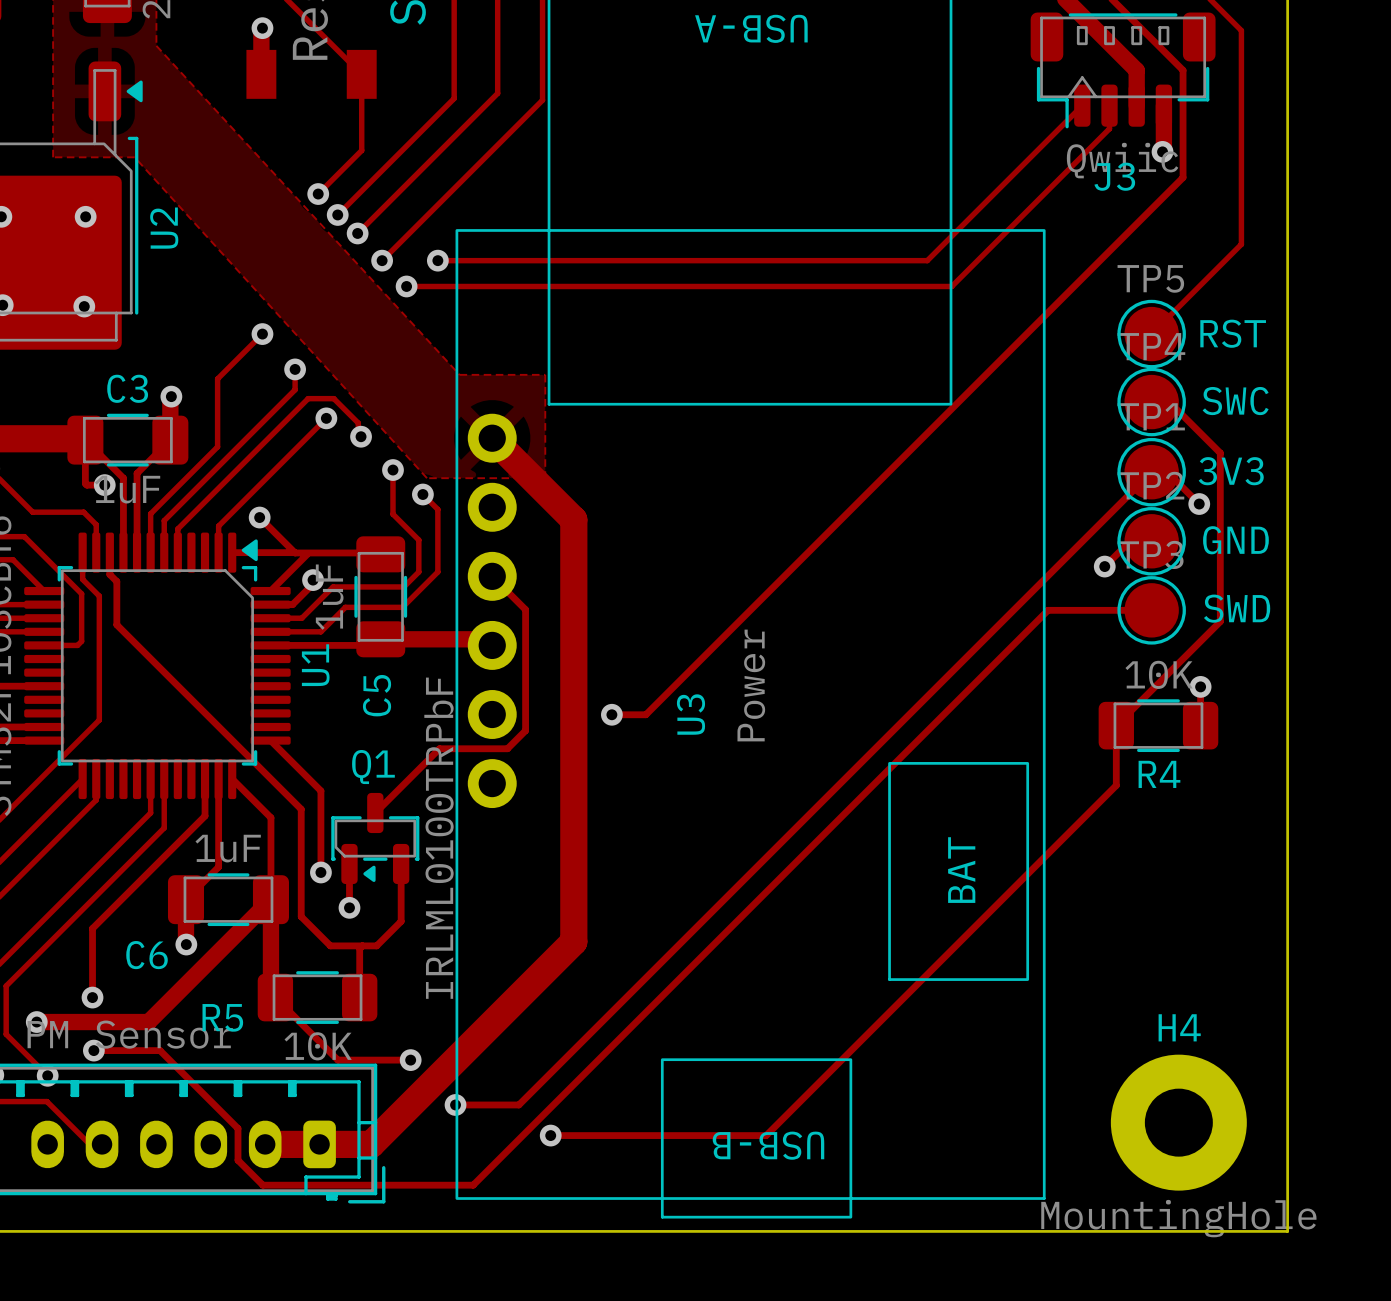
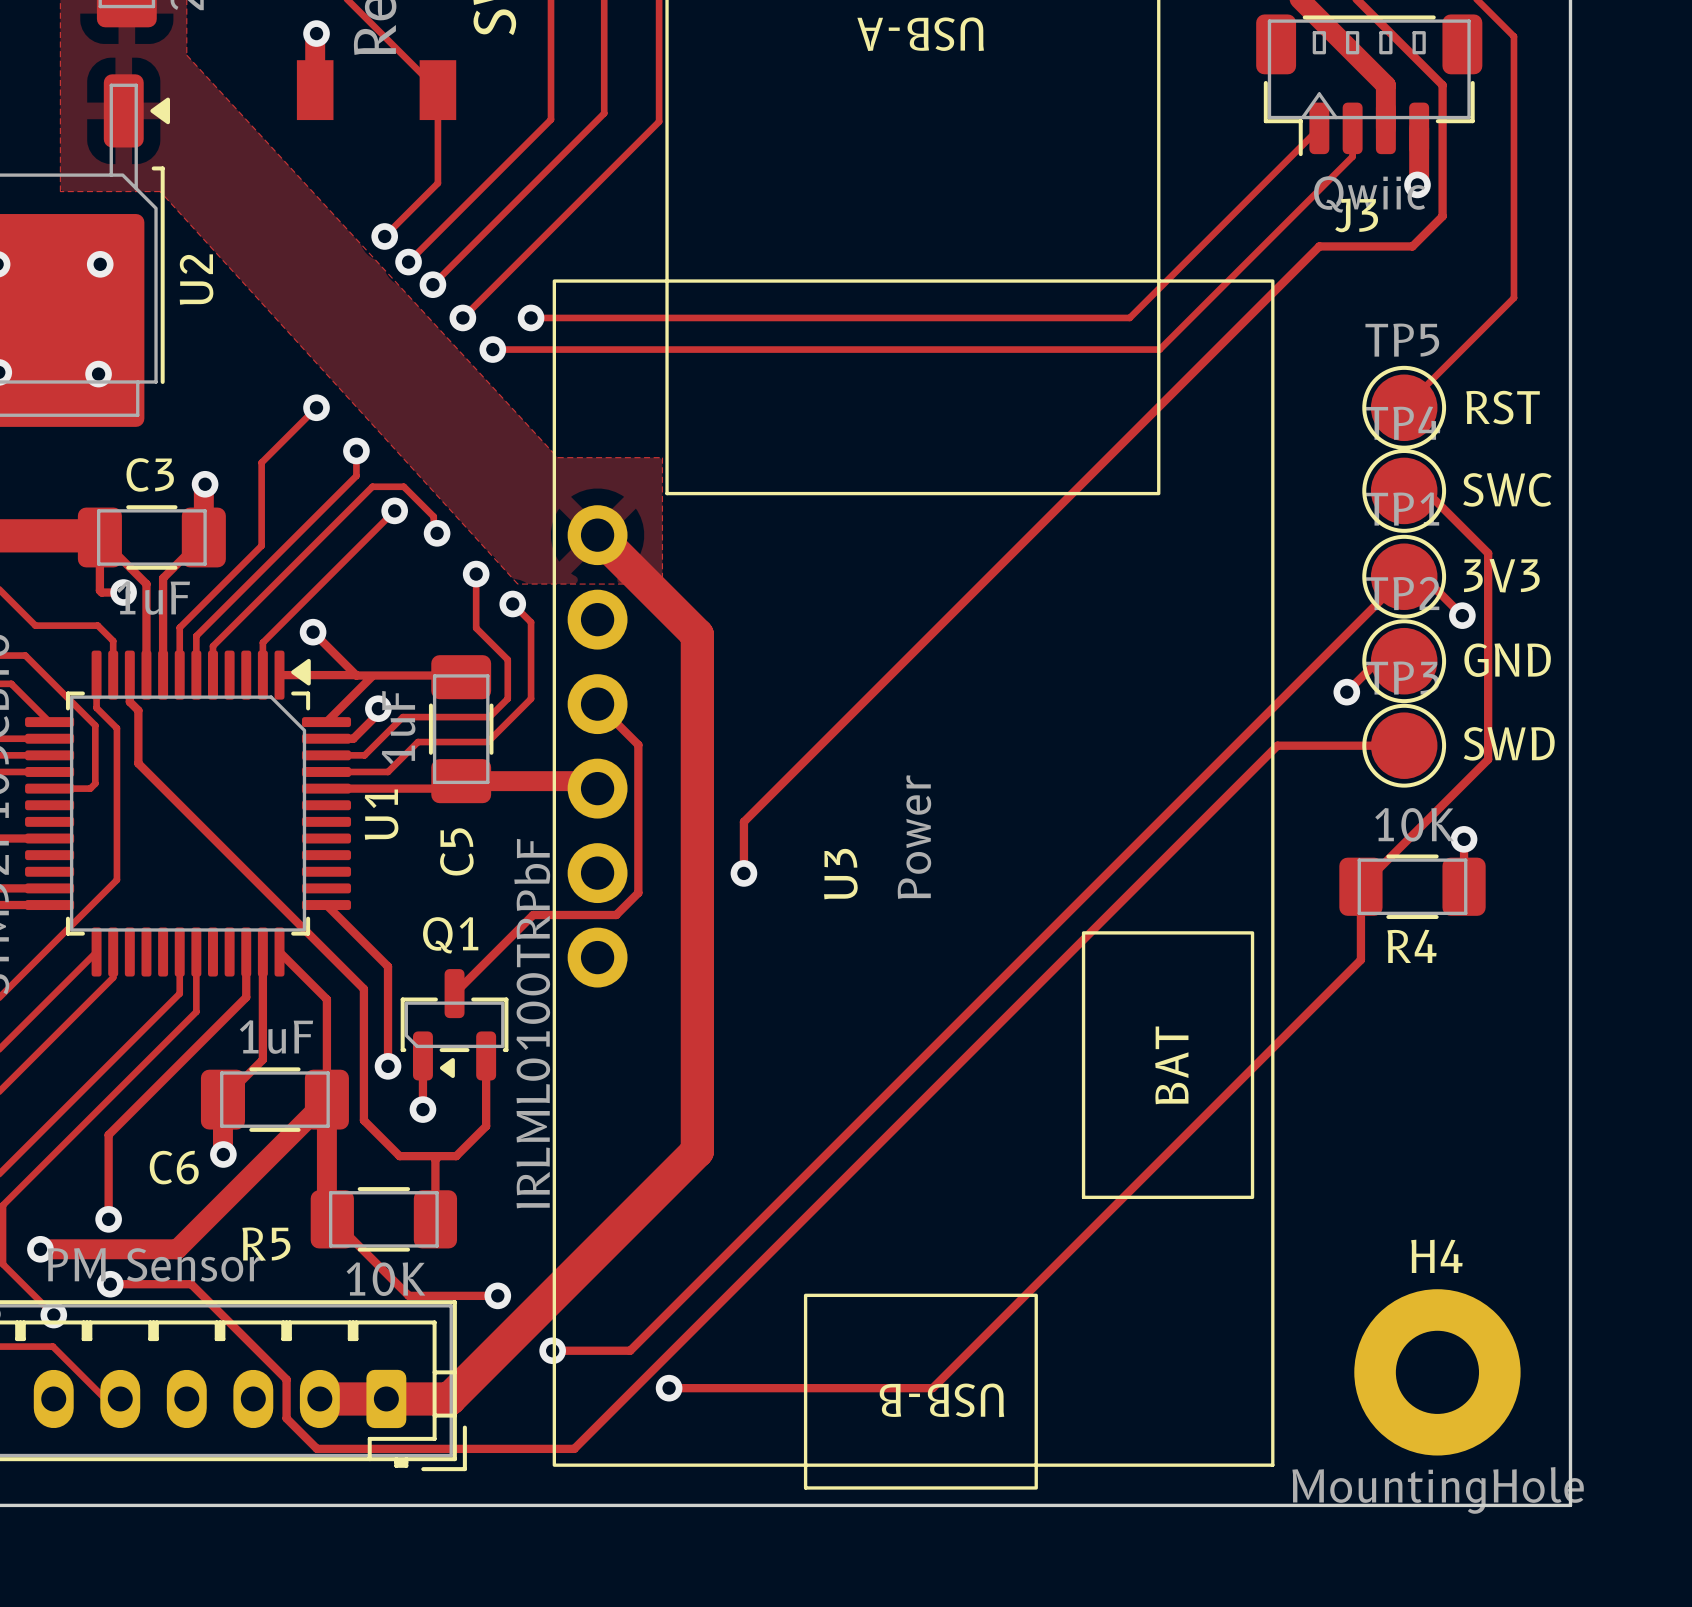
track: (1158, 202) (645, 714) (611, 714) -> (1412, 246) (1319, 246) (743, 821) (743, 873)

